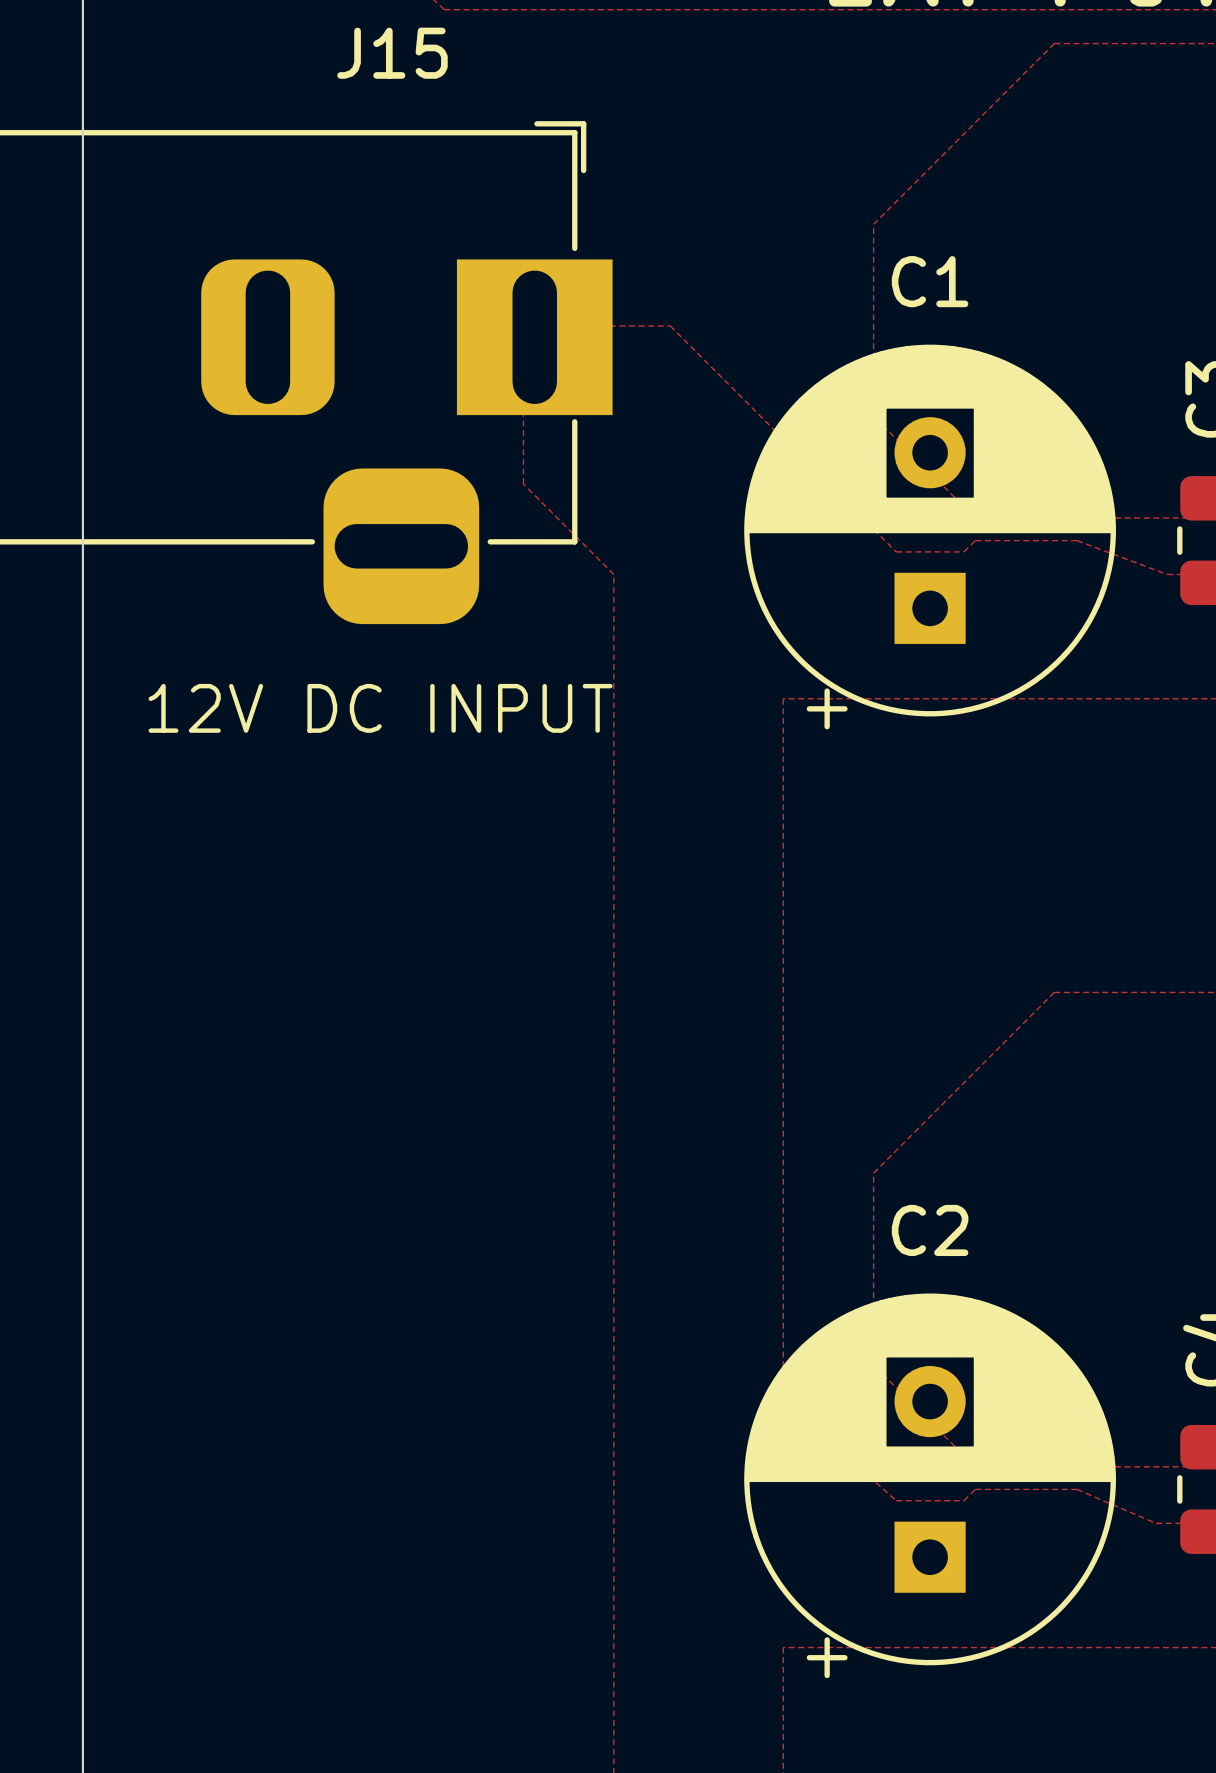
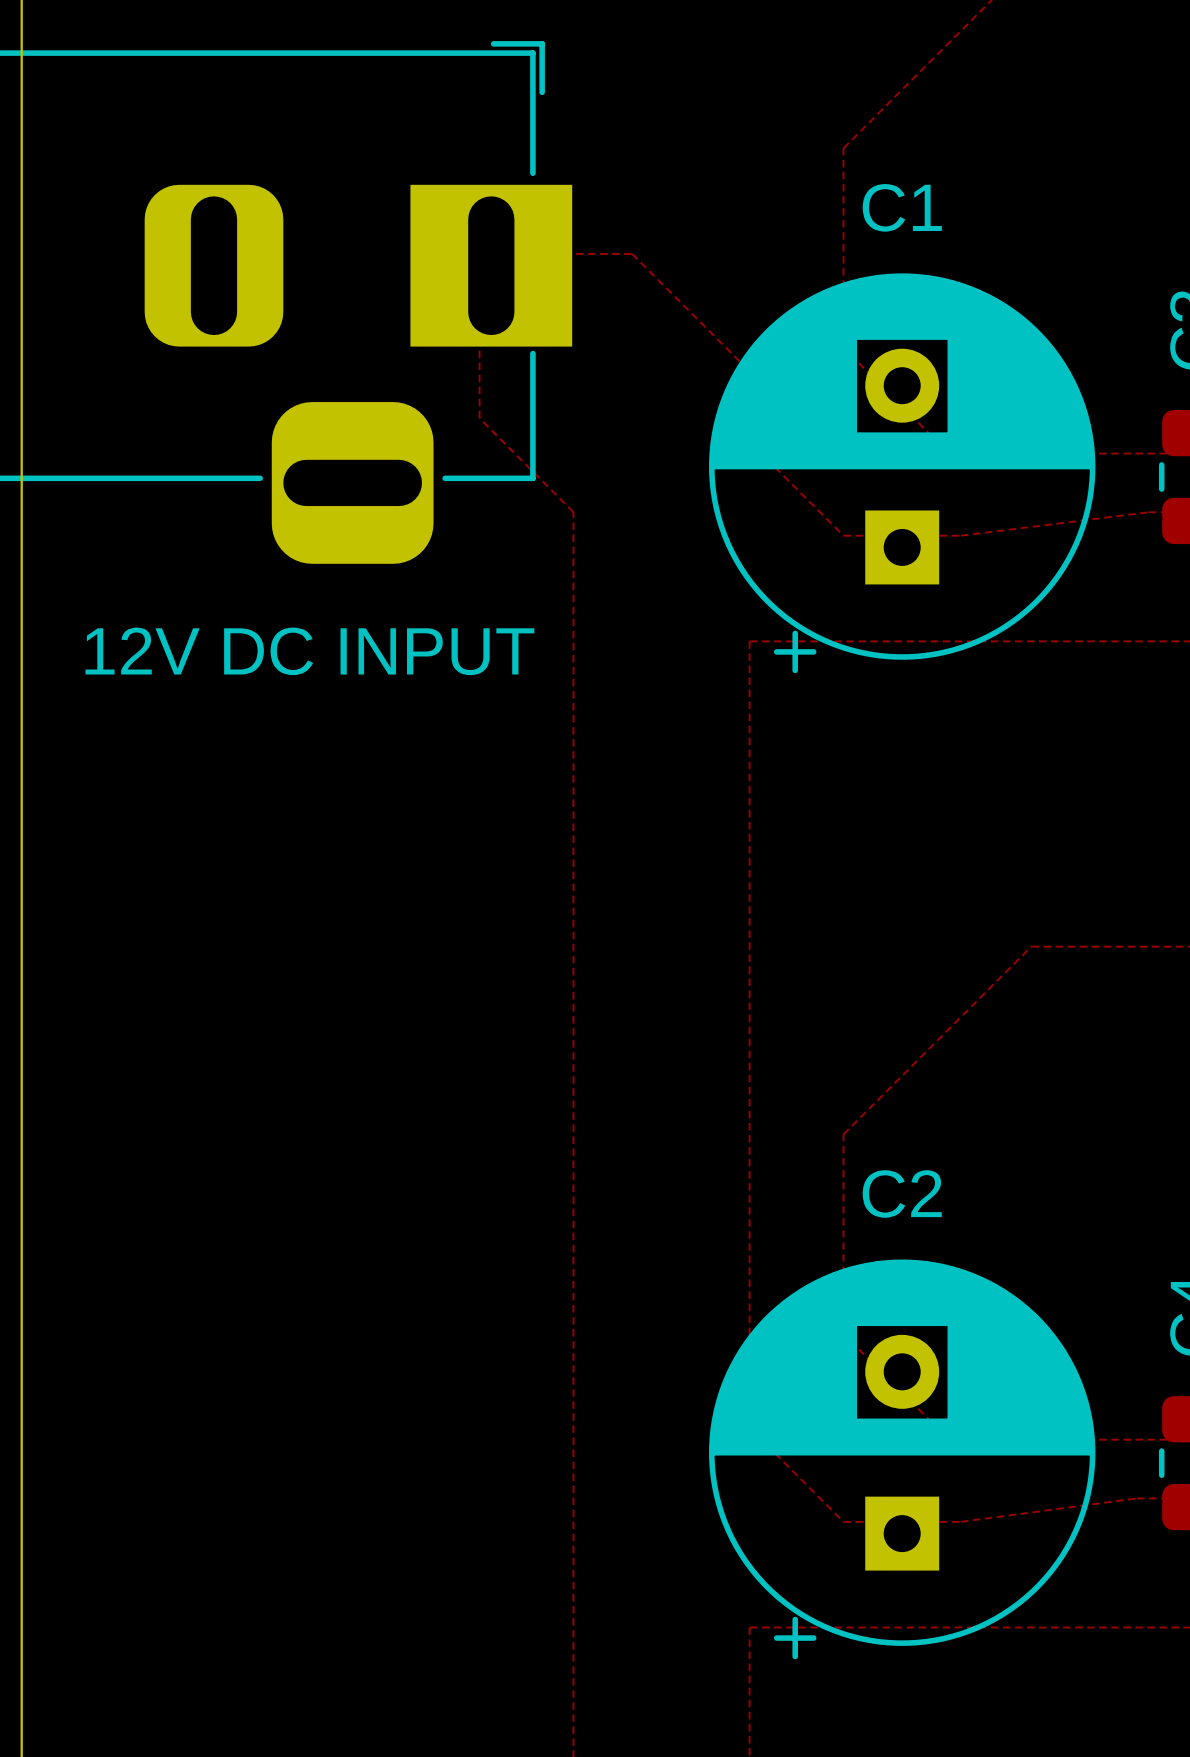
zone outline: (783, 438) (896, 551) (963, 551) (975, 540) (1076, 540) (1167, 574) -> (749, 371) (749, 441) (843, 535) (960, 535) (1148, 512)
zone outline: (783, 1399) (896, 1500) (963, 1500) (975, 1489) (1076, 1489) (1156, 1523) -> (749, 1369) (749, 1427) (843, 1521) (960, 1521) (1137, 1498)

